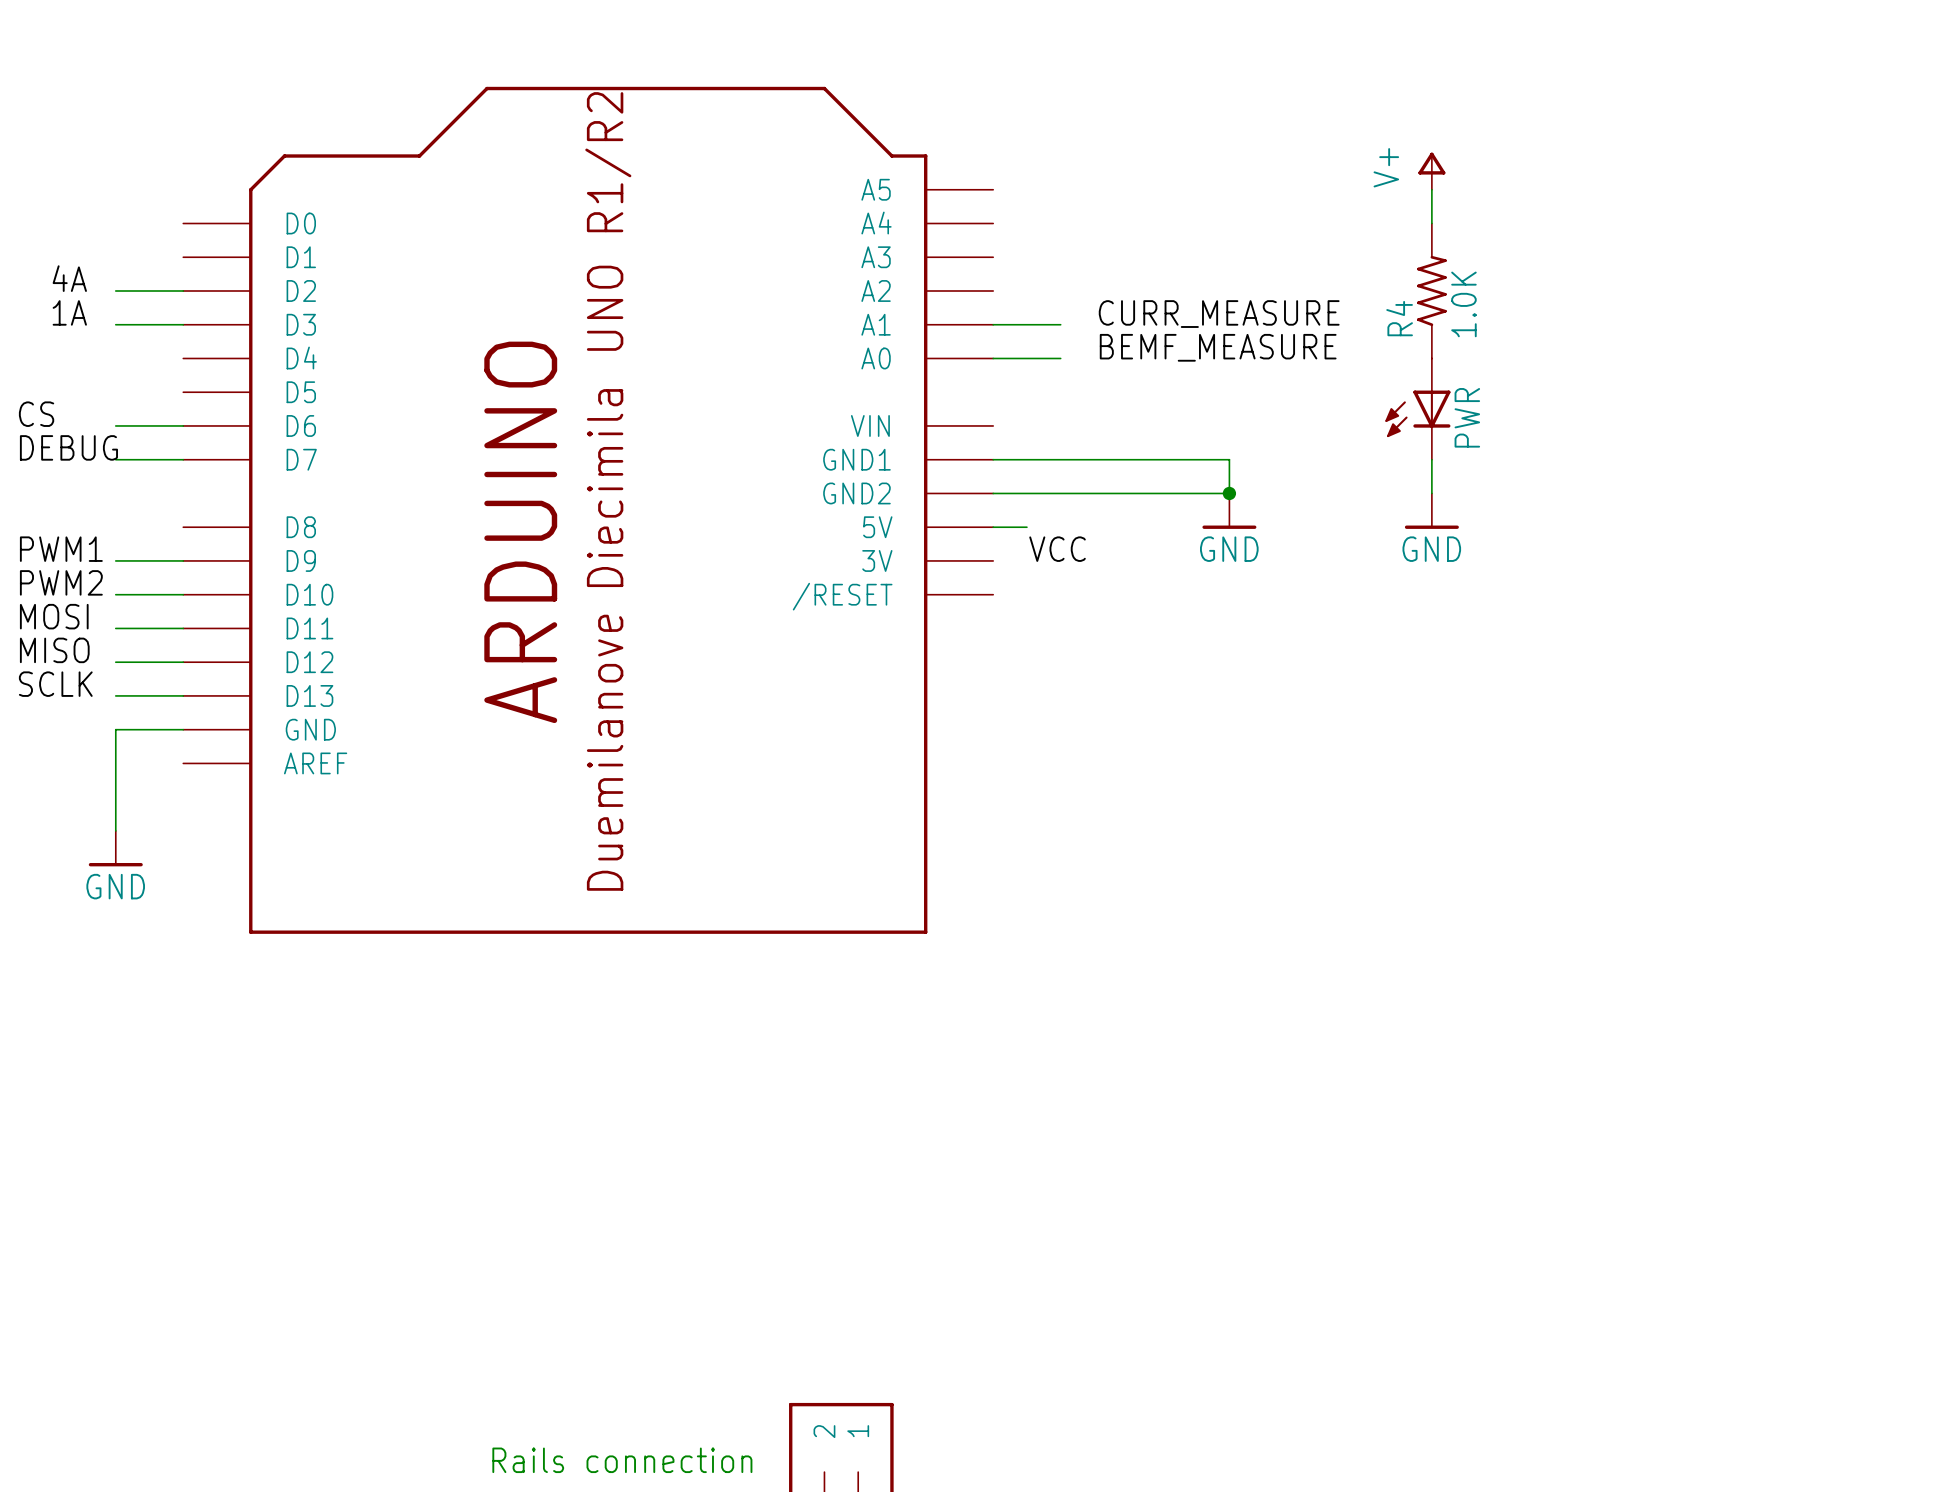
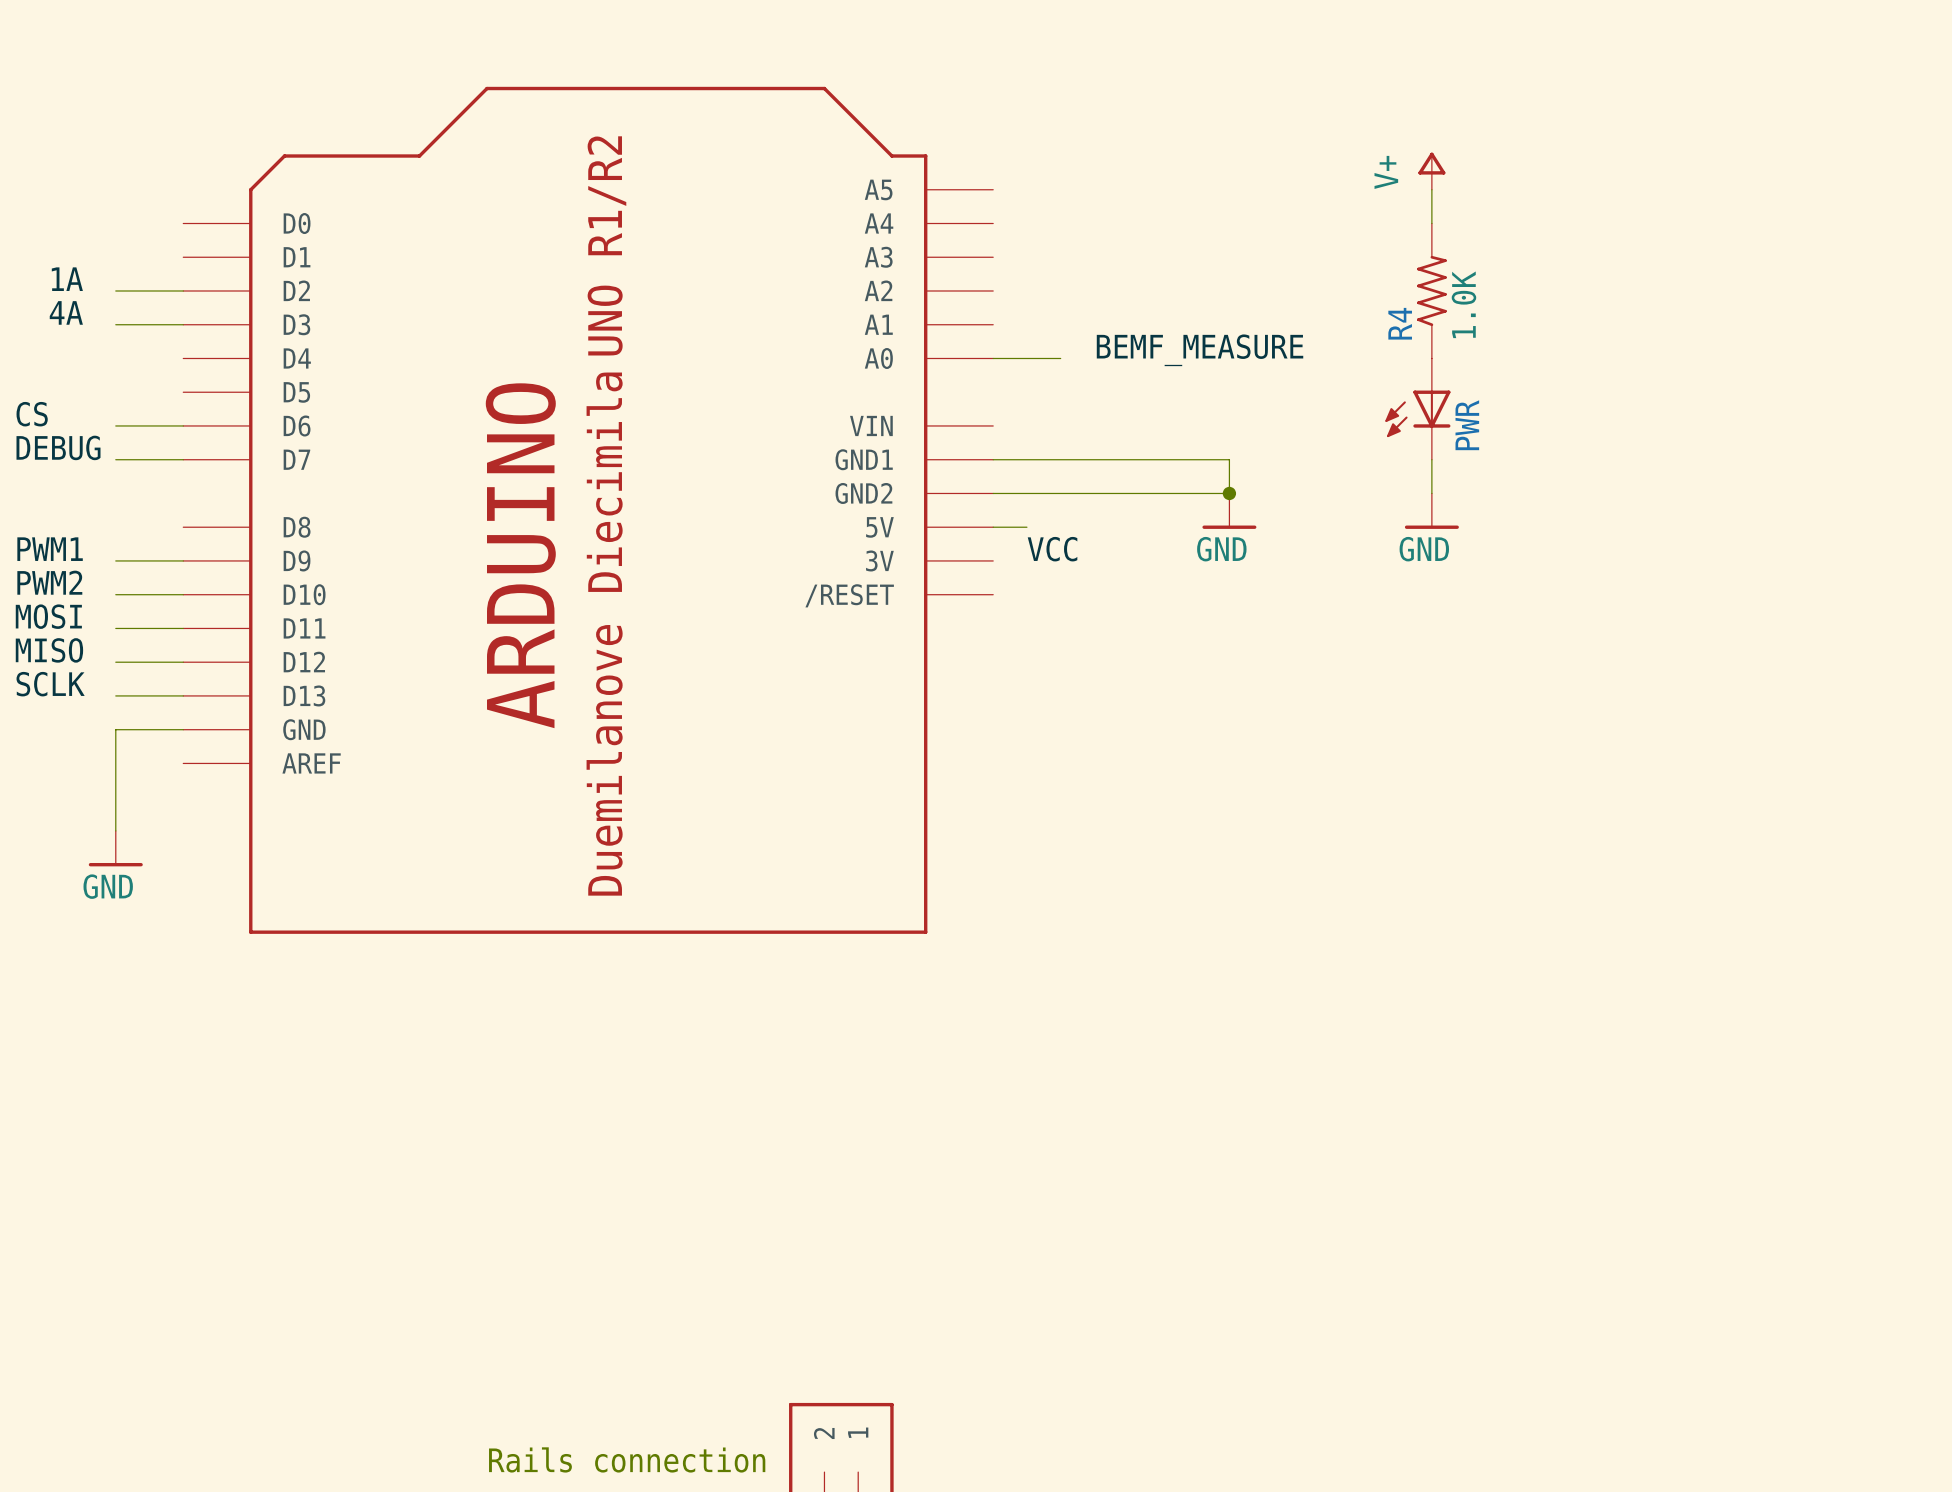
label: 4A (69, 278) -> 1A (67, 279)
label: 1A (69, 312) -> 4A (66, 312)
label: CURR_MEASURE (1219, 314) -> none
wire: (993, 324) (1060, 324) -> none

